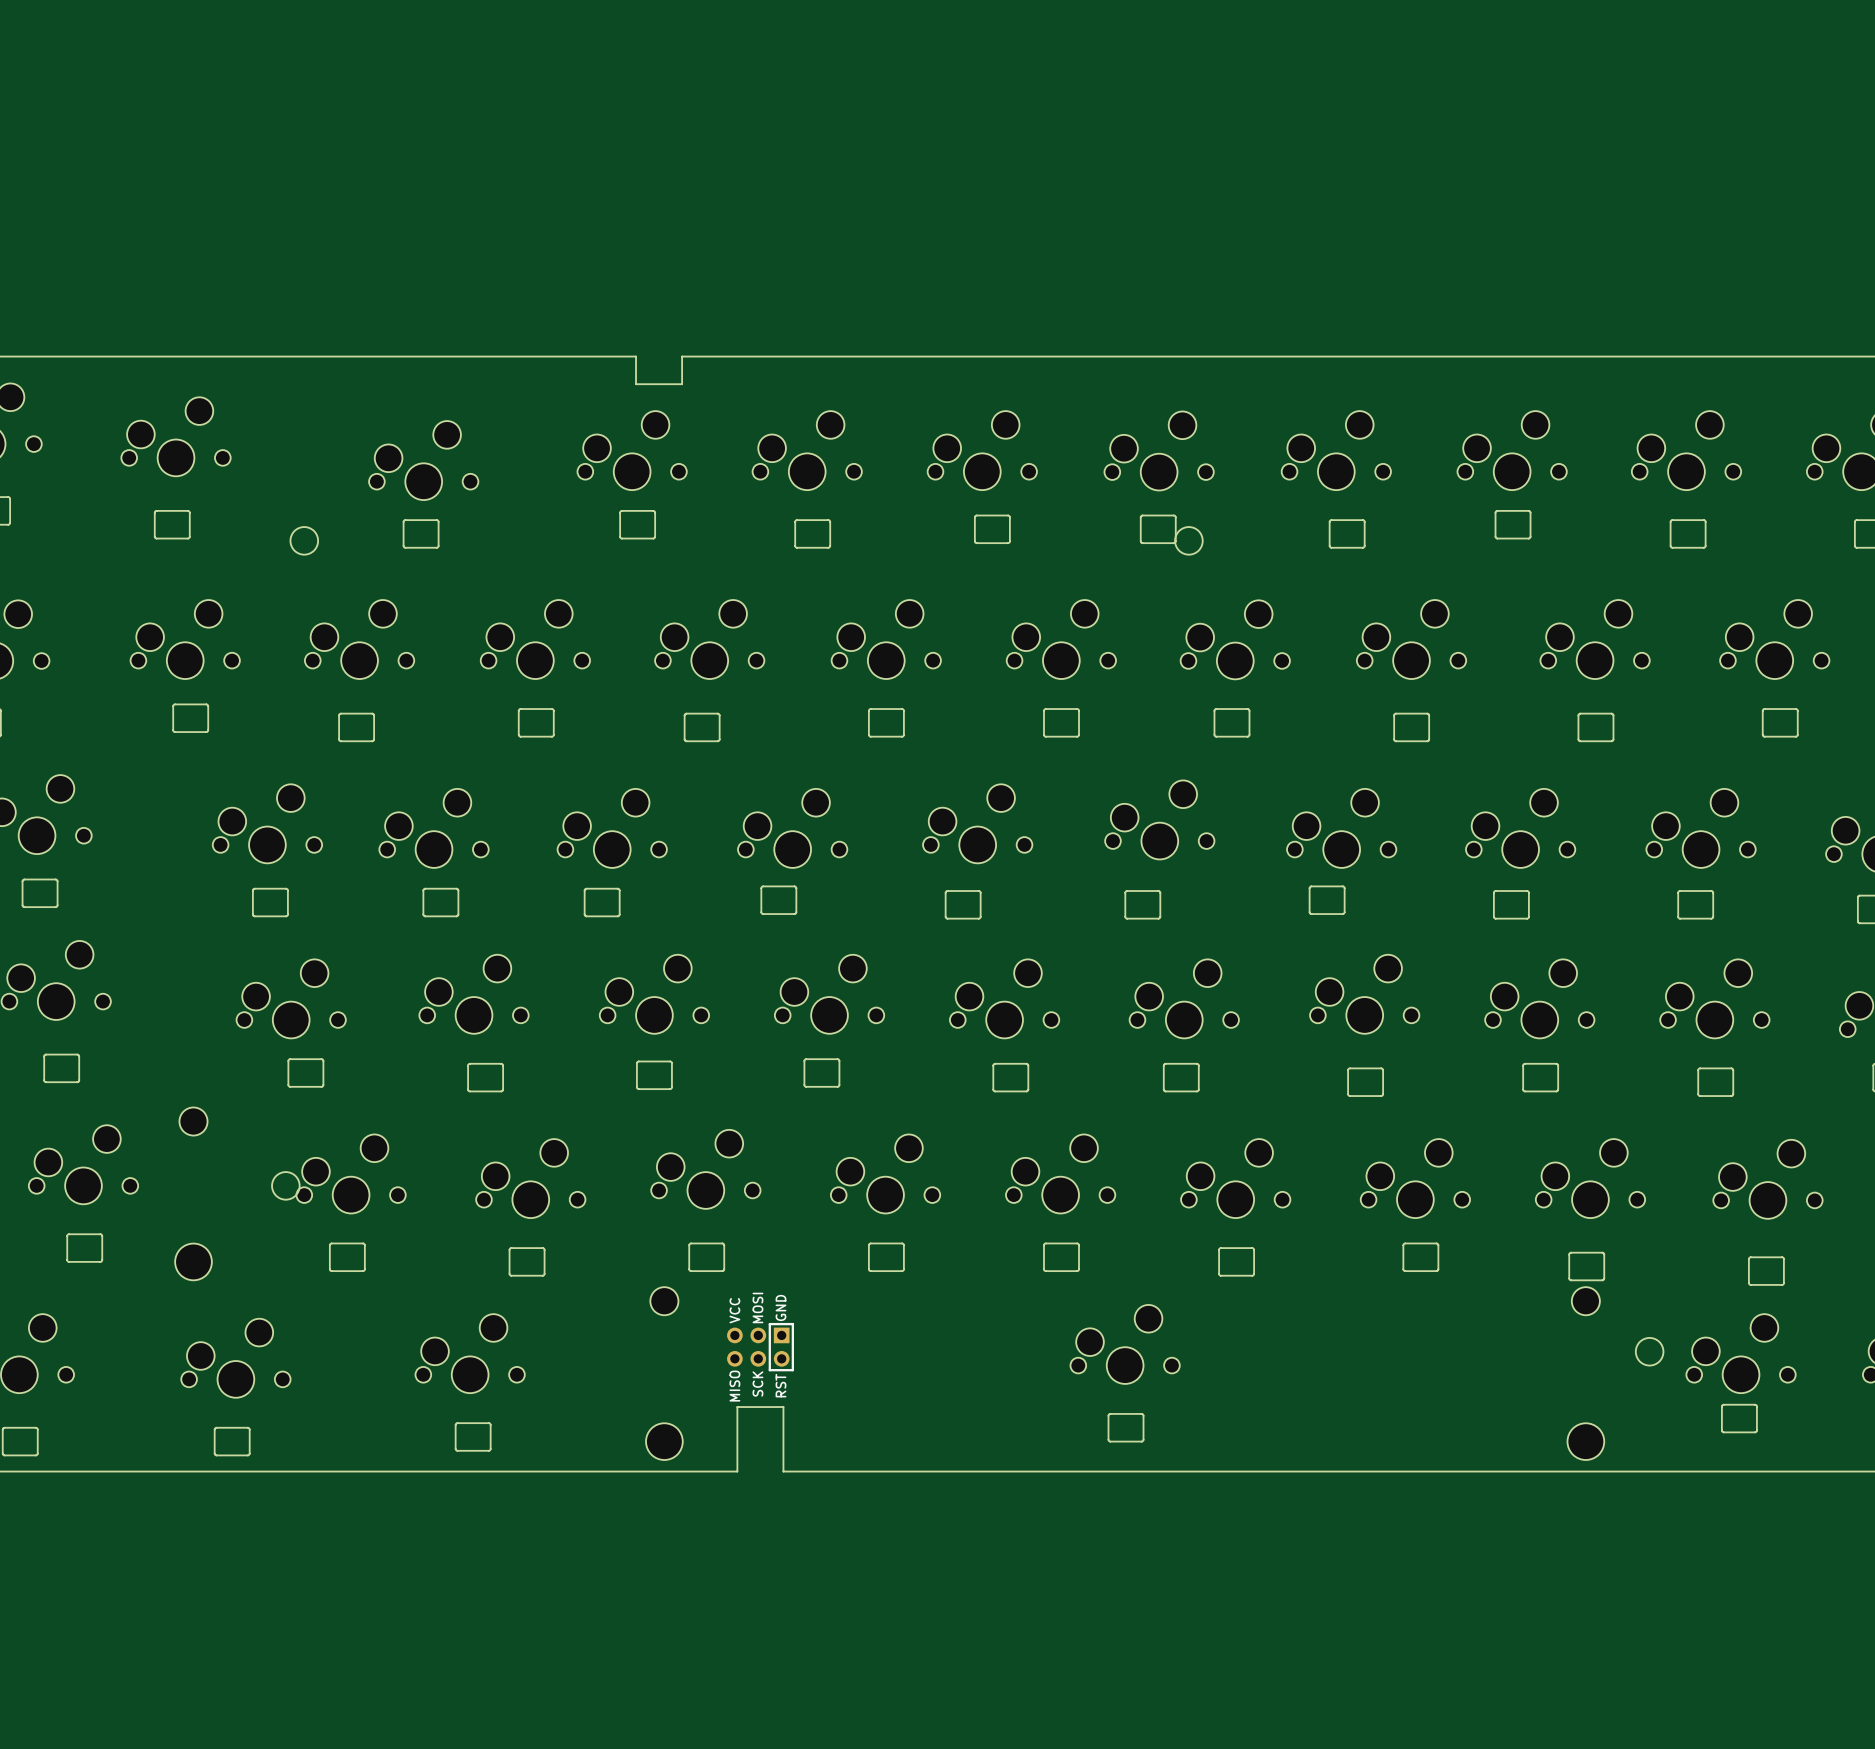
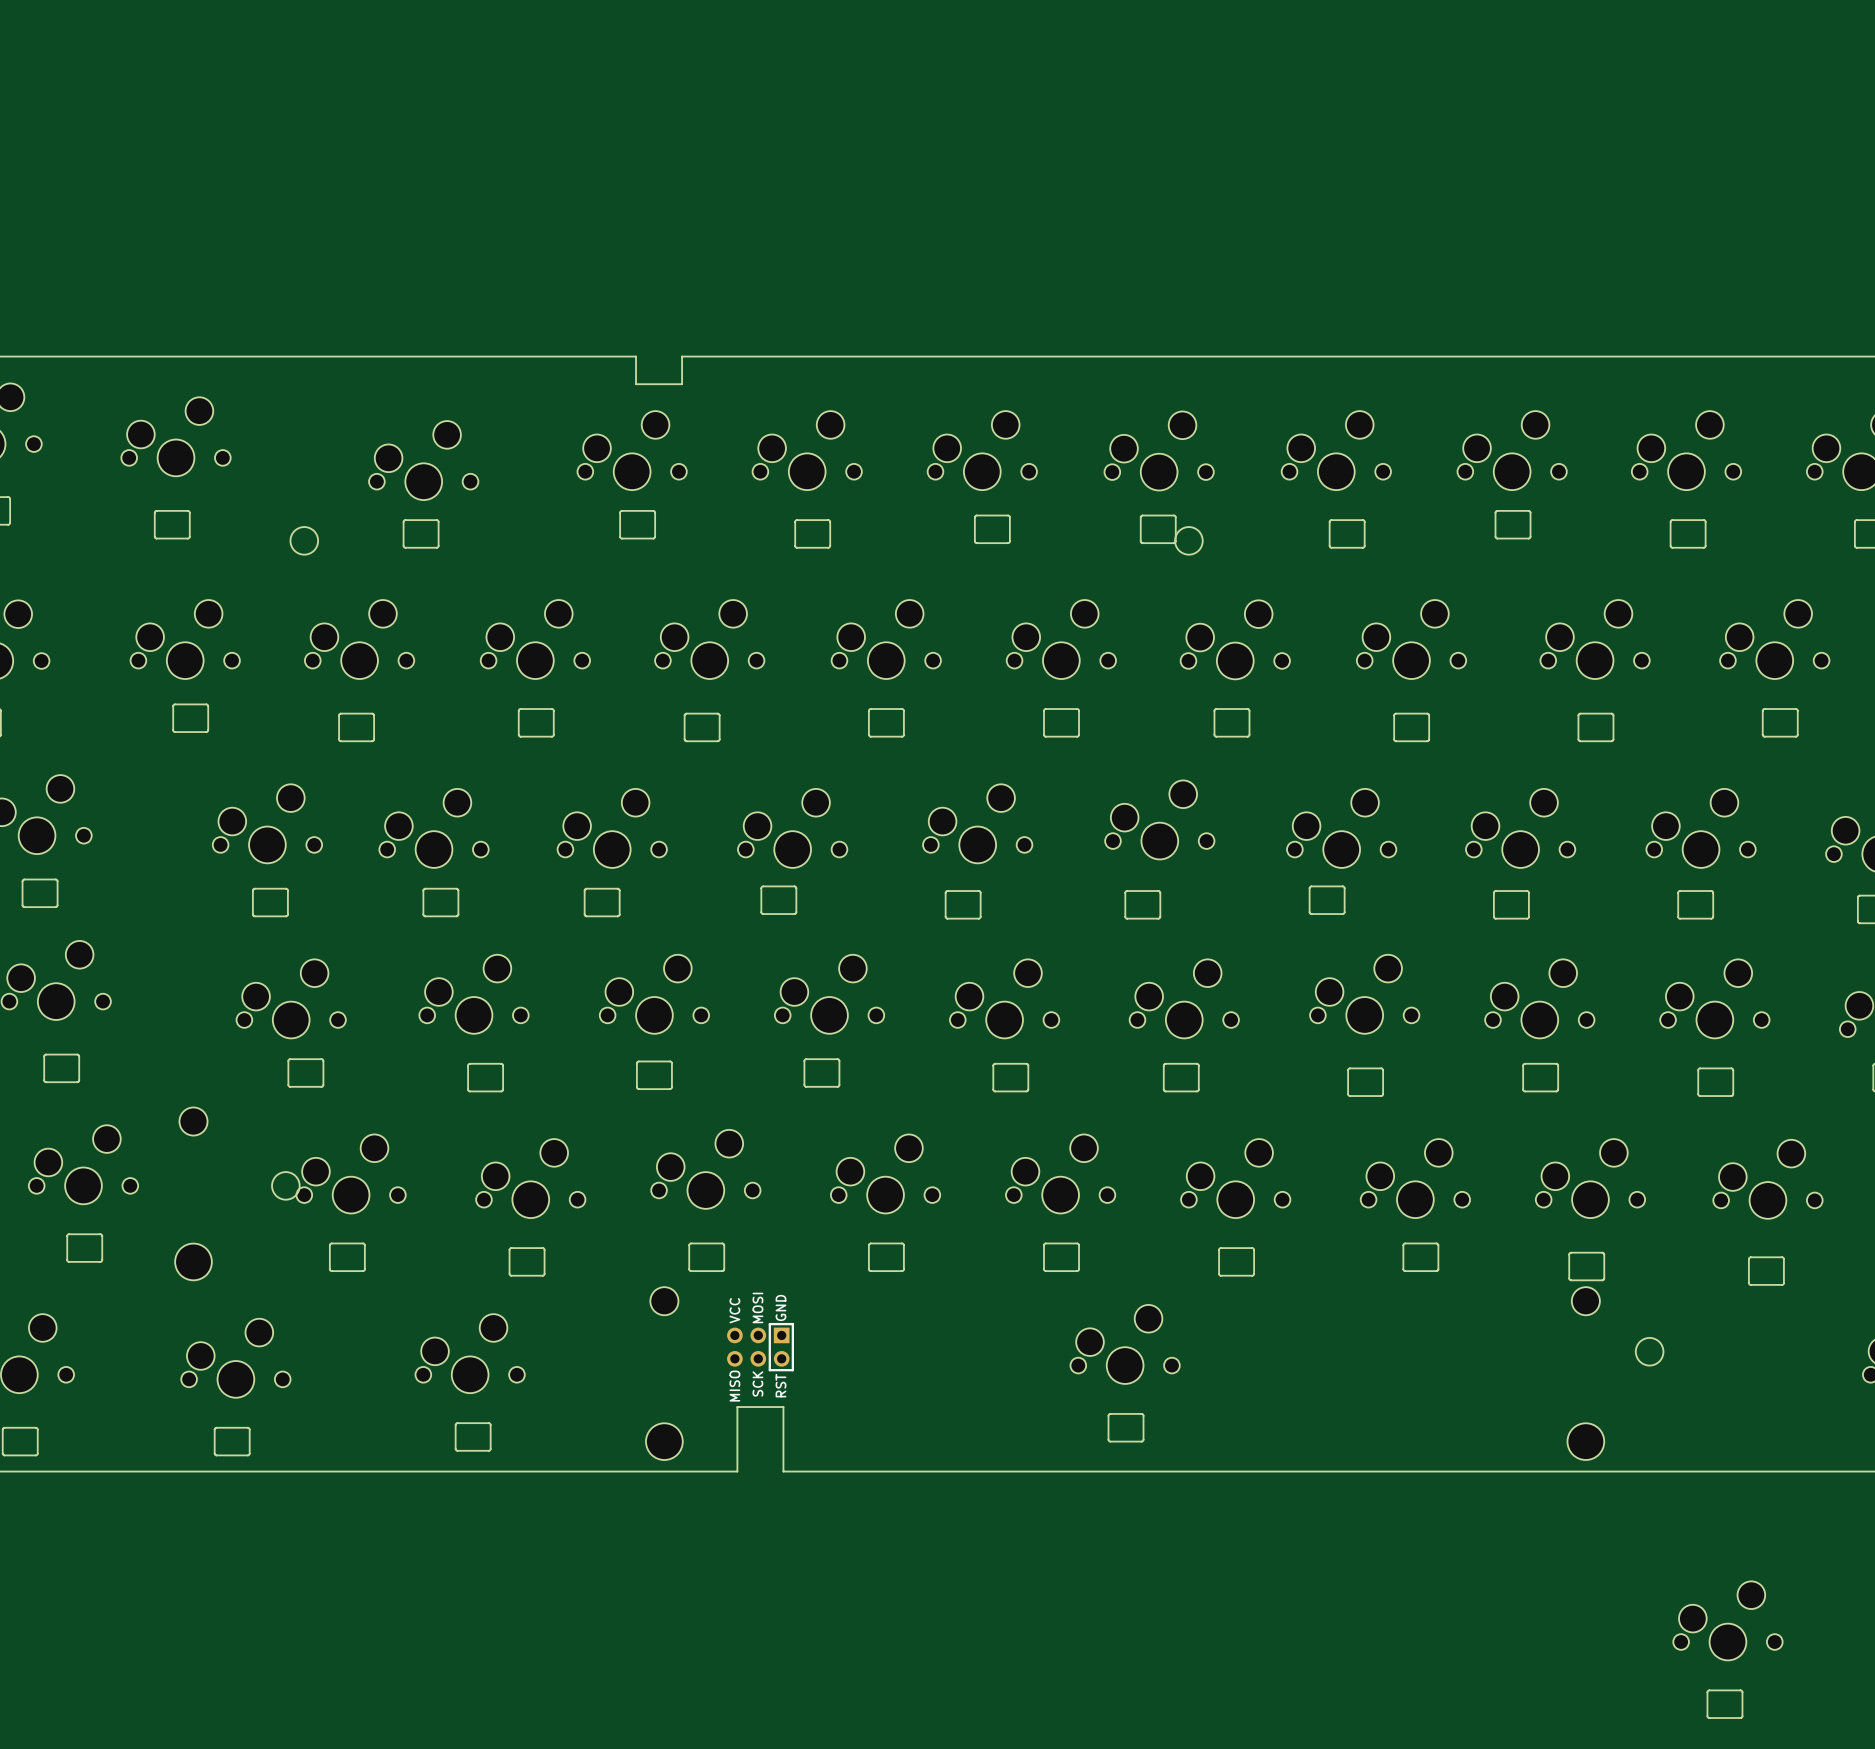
part: (1741, 1353) -> none
part: (1739, 1418) -> none
part: none -> (1727, 1620)
part: none -> (1724, 1704)

